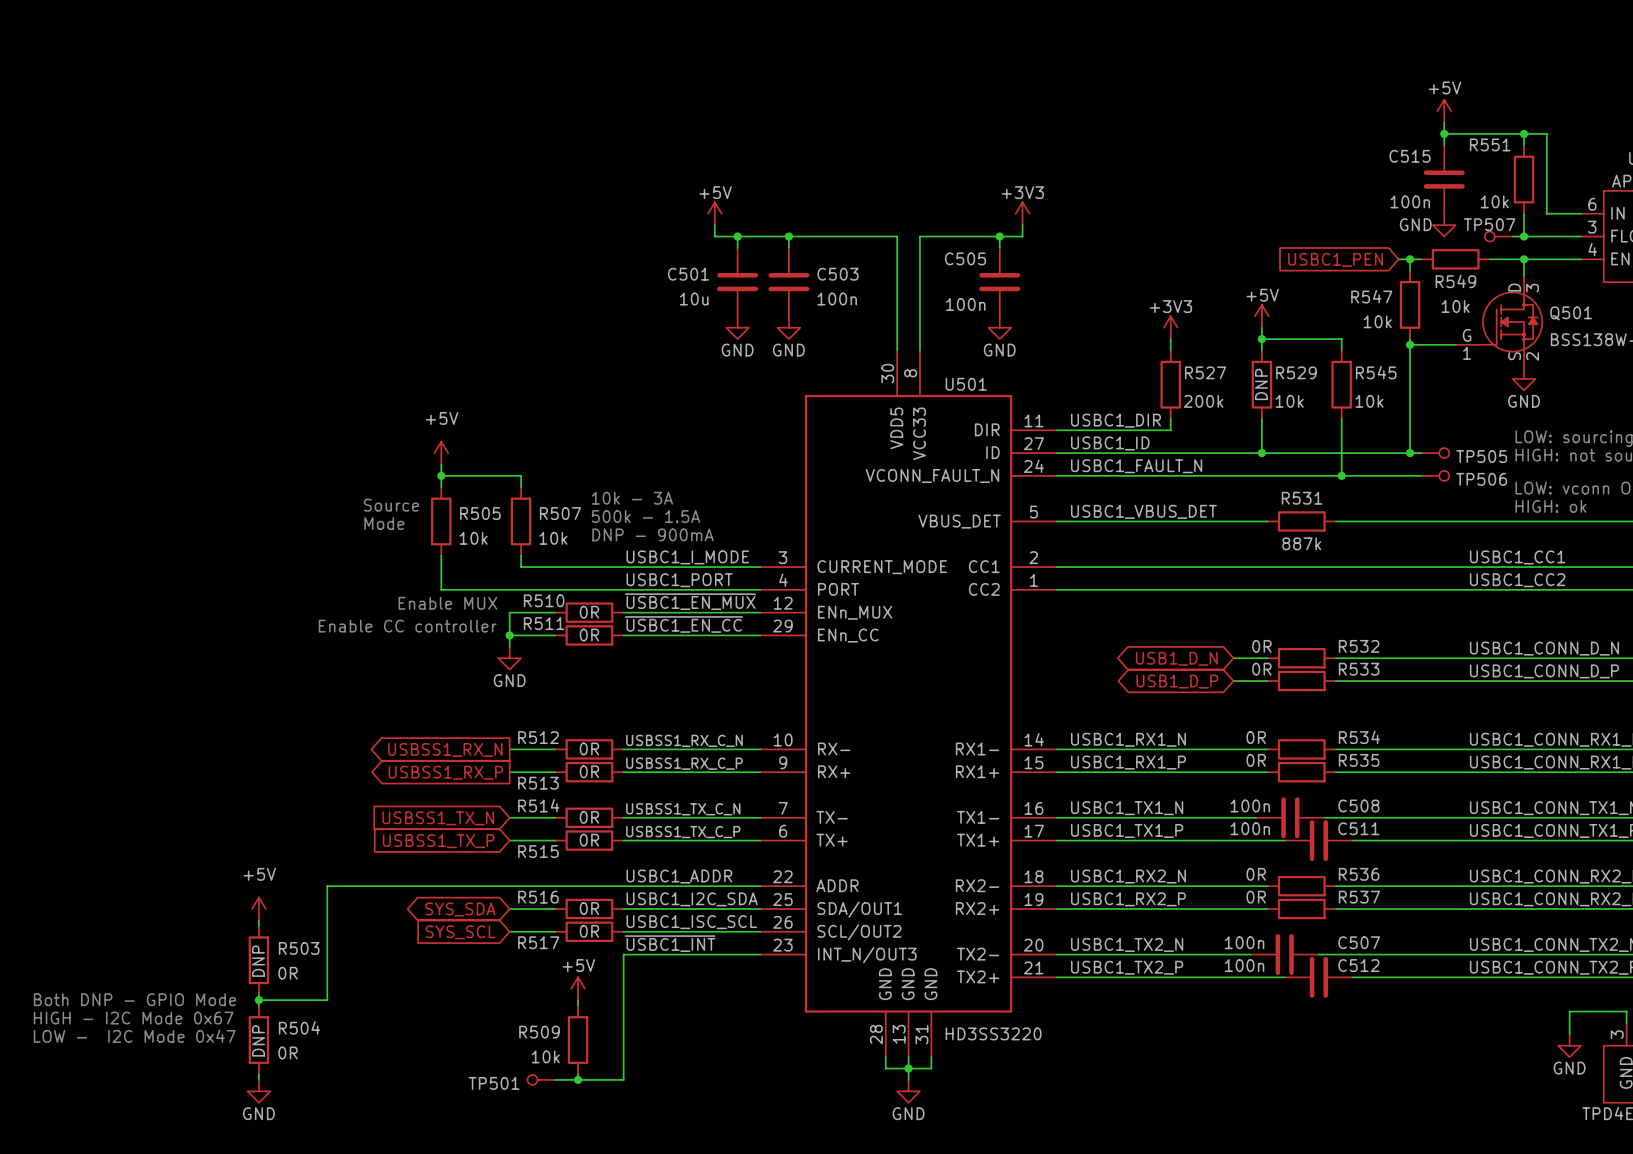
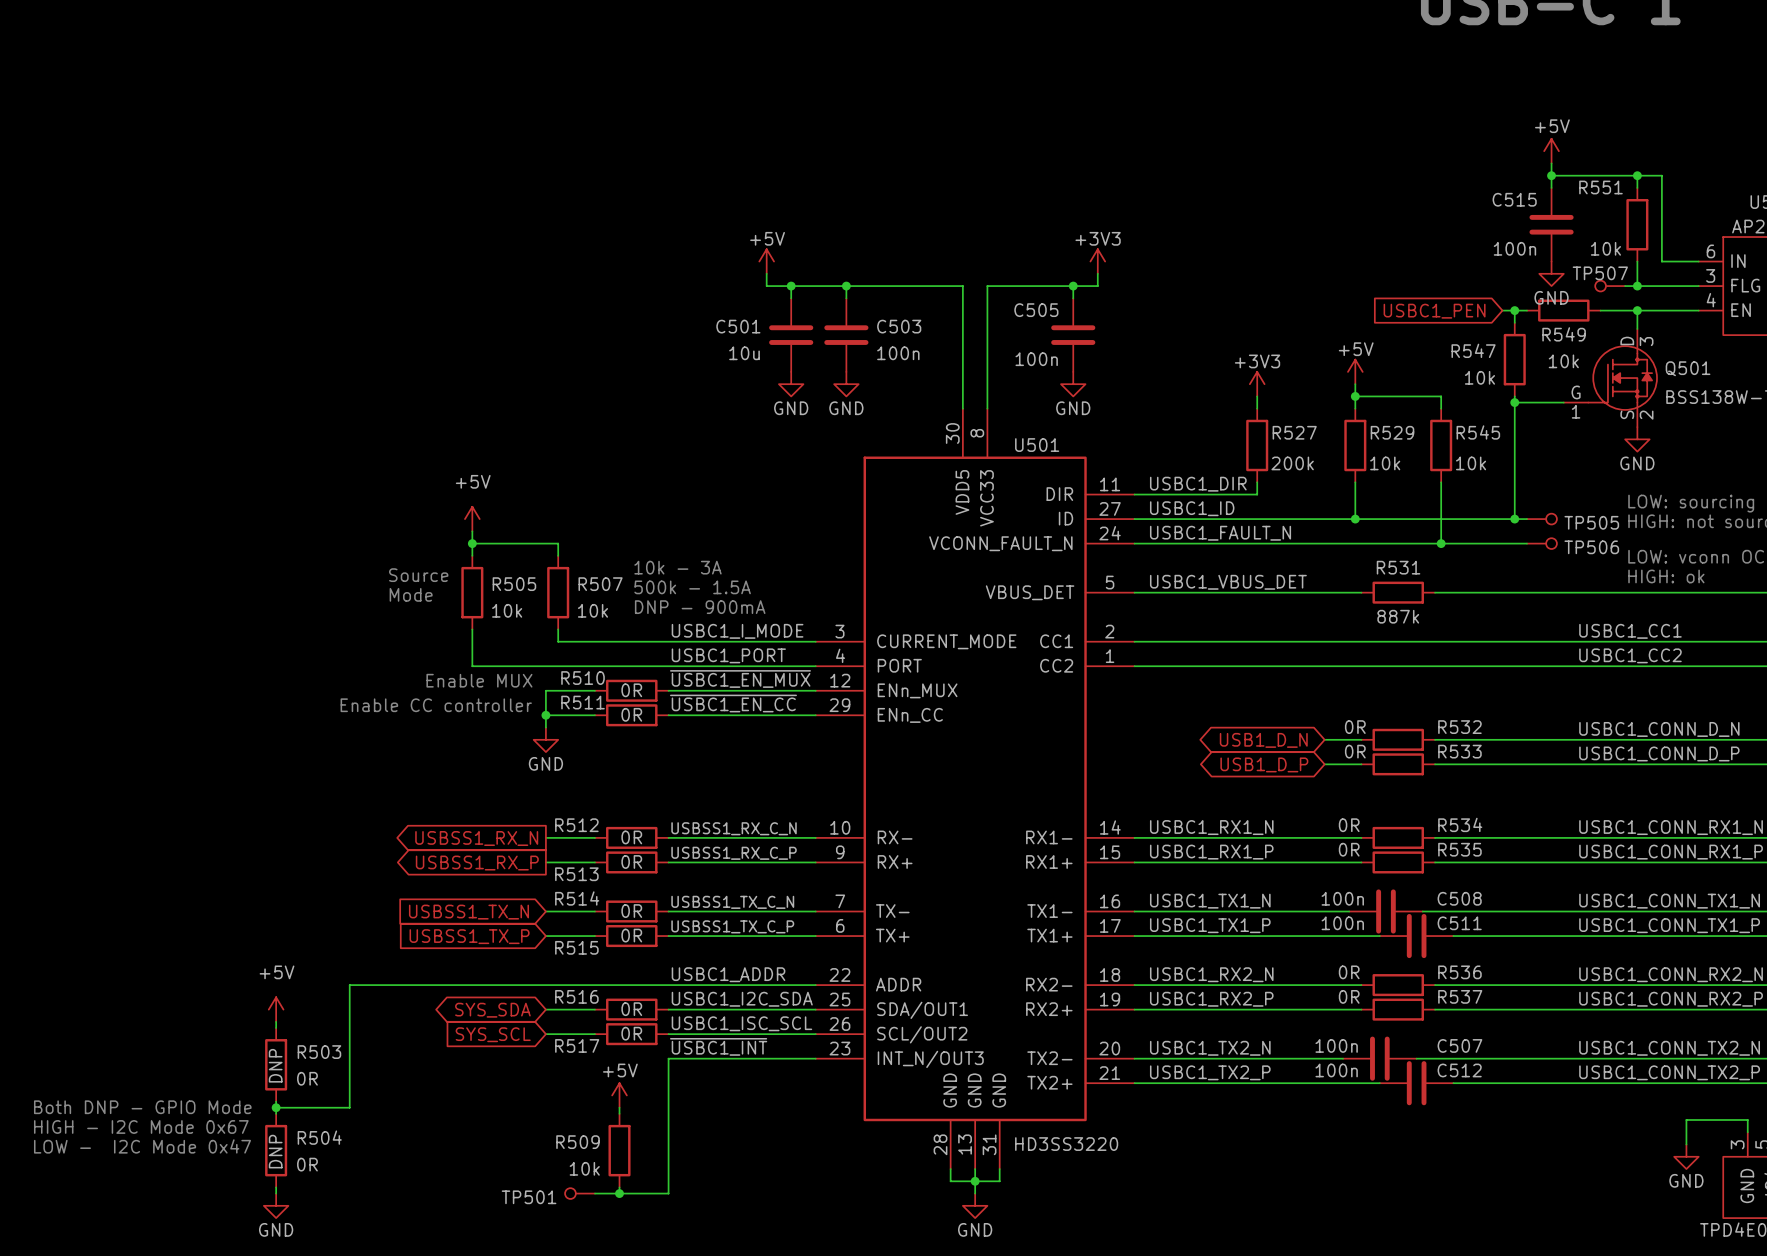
power symbol text position: GND (1415, 224) -> GND (1551, 297)
R529 text: DNP (1261, 384) -> none

